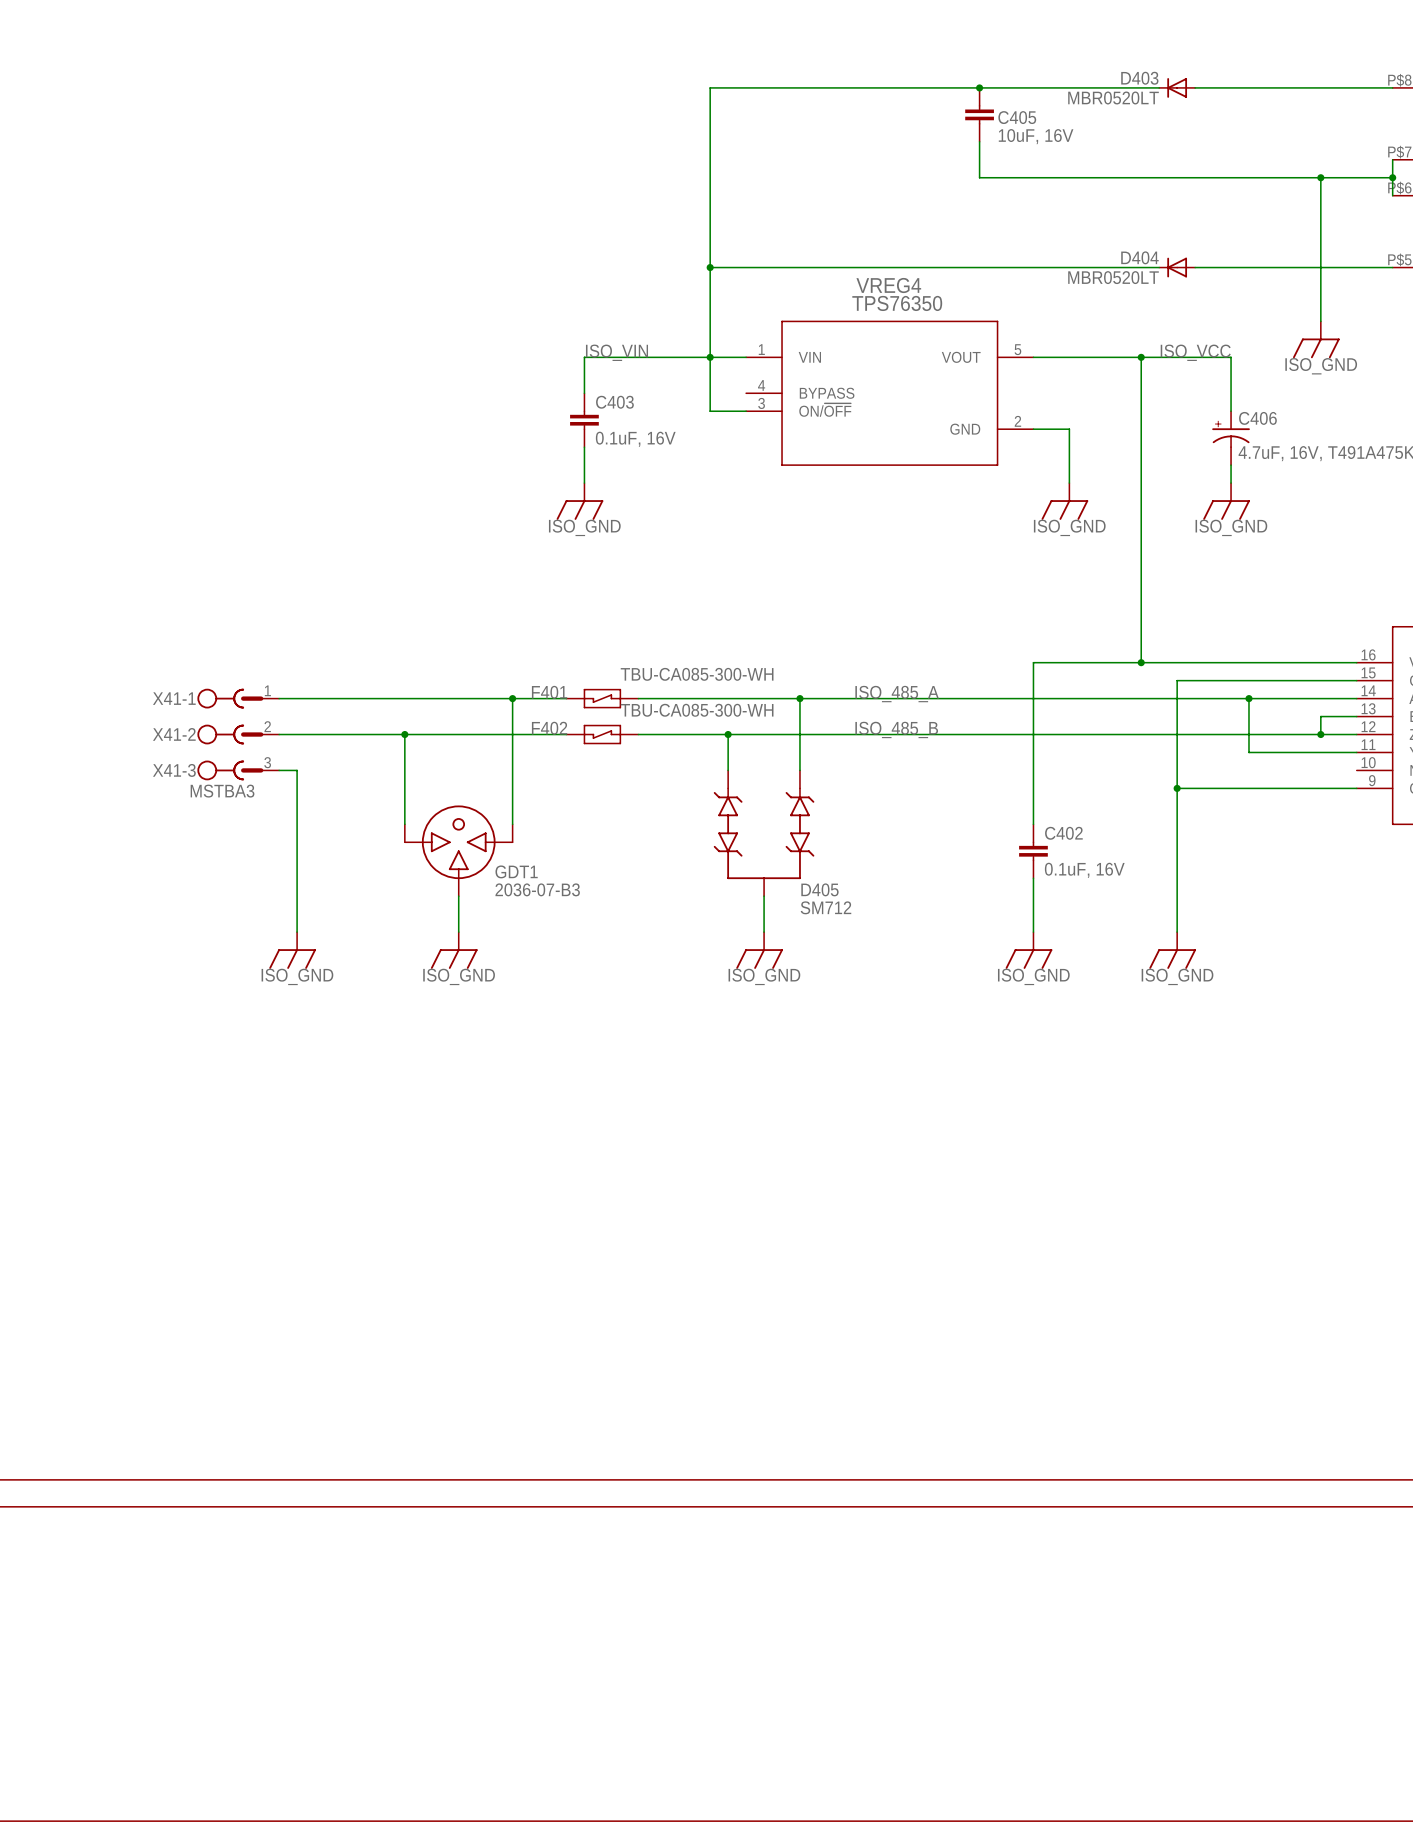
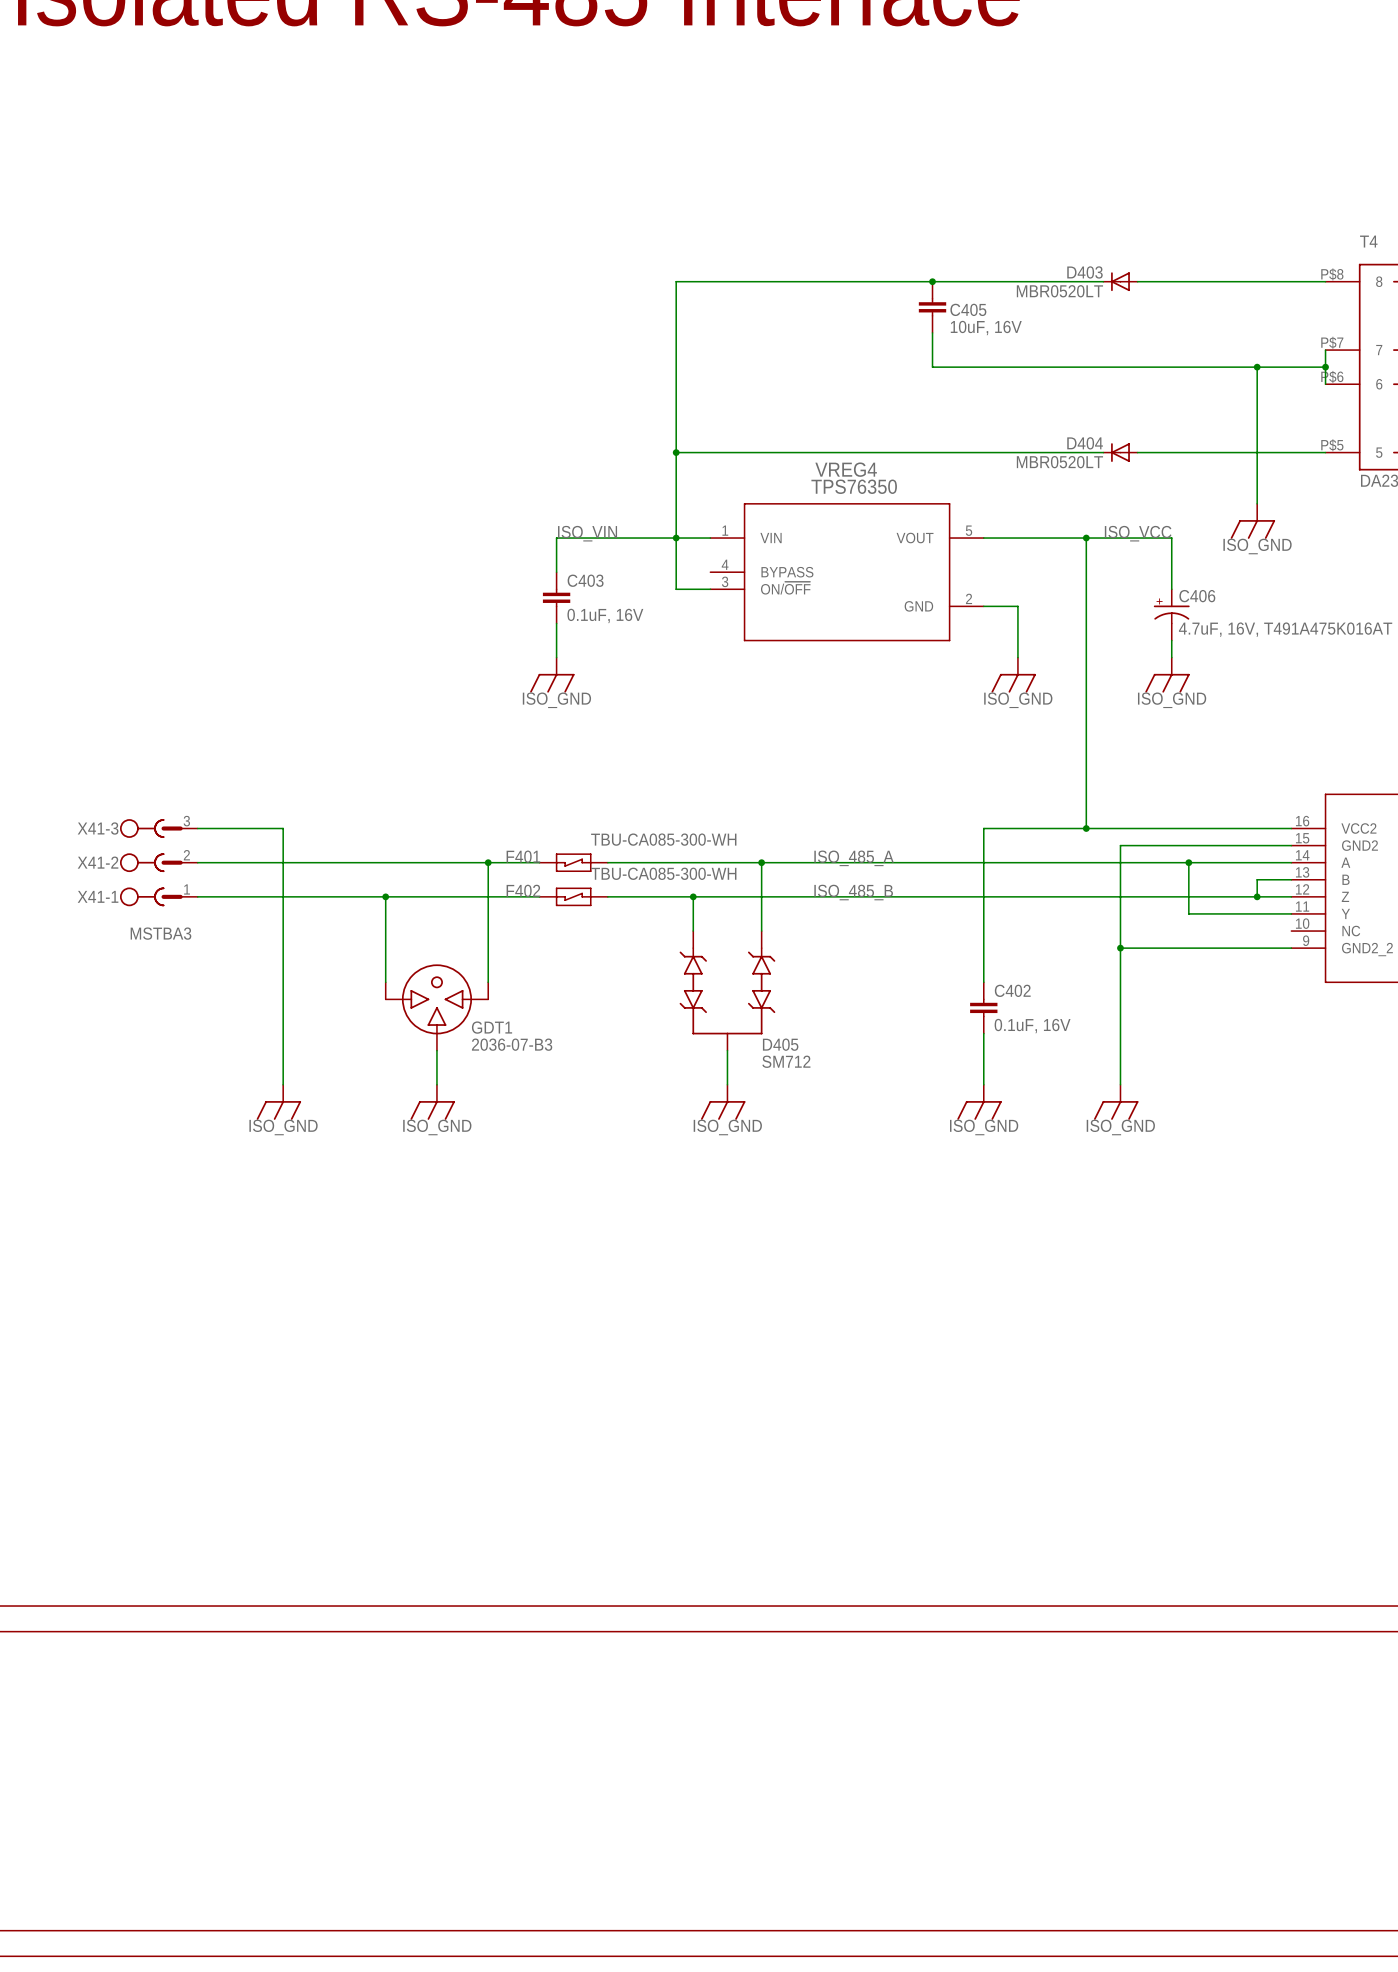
X41-1 position: (238, 698) -> (158, 896)
X41-2 position: (238, 734) -> (158, 862)
X41-3 position: (238, 770) -> (158, 828)
wire: (279, 770) (297, 770) -> (197, 828) (283, 828) (283, 931)
X41-3 value position: MSTBA3 (222, 791) -> MSTBA3 (160, 933)

